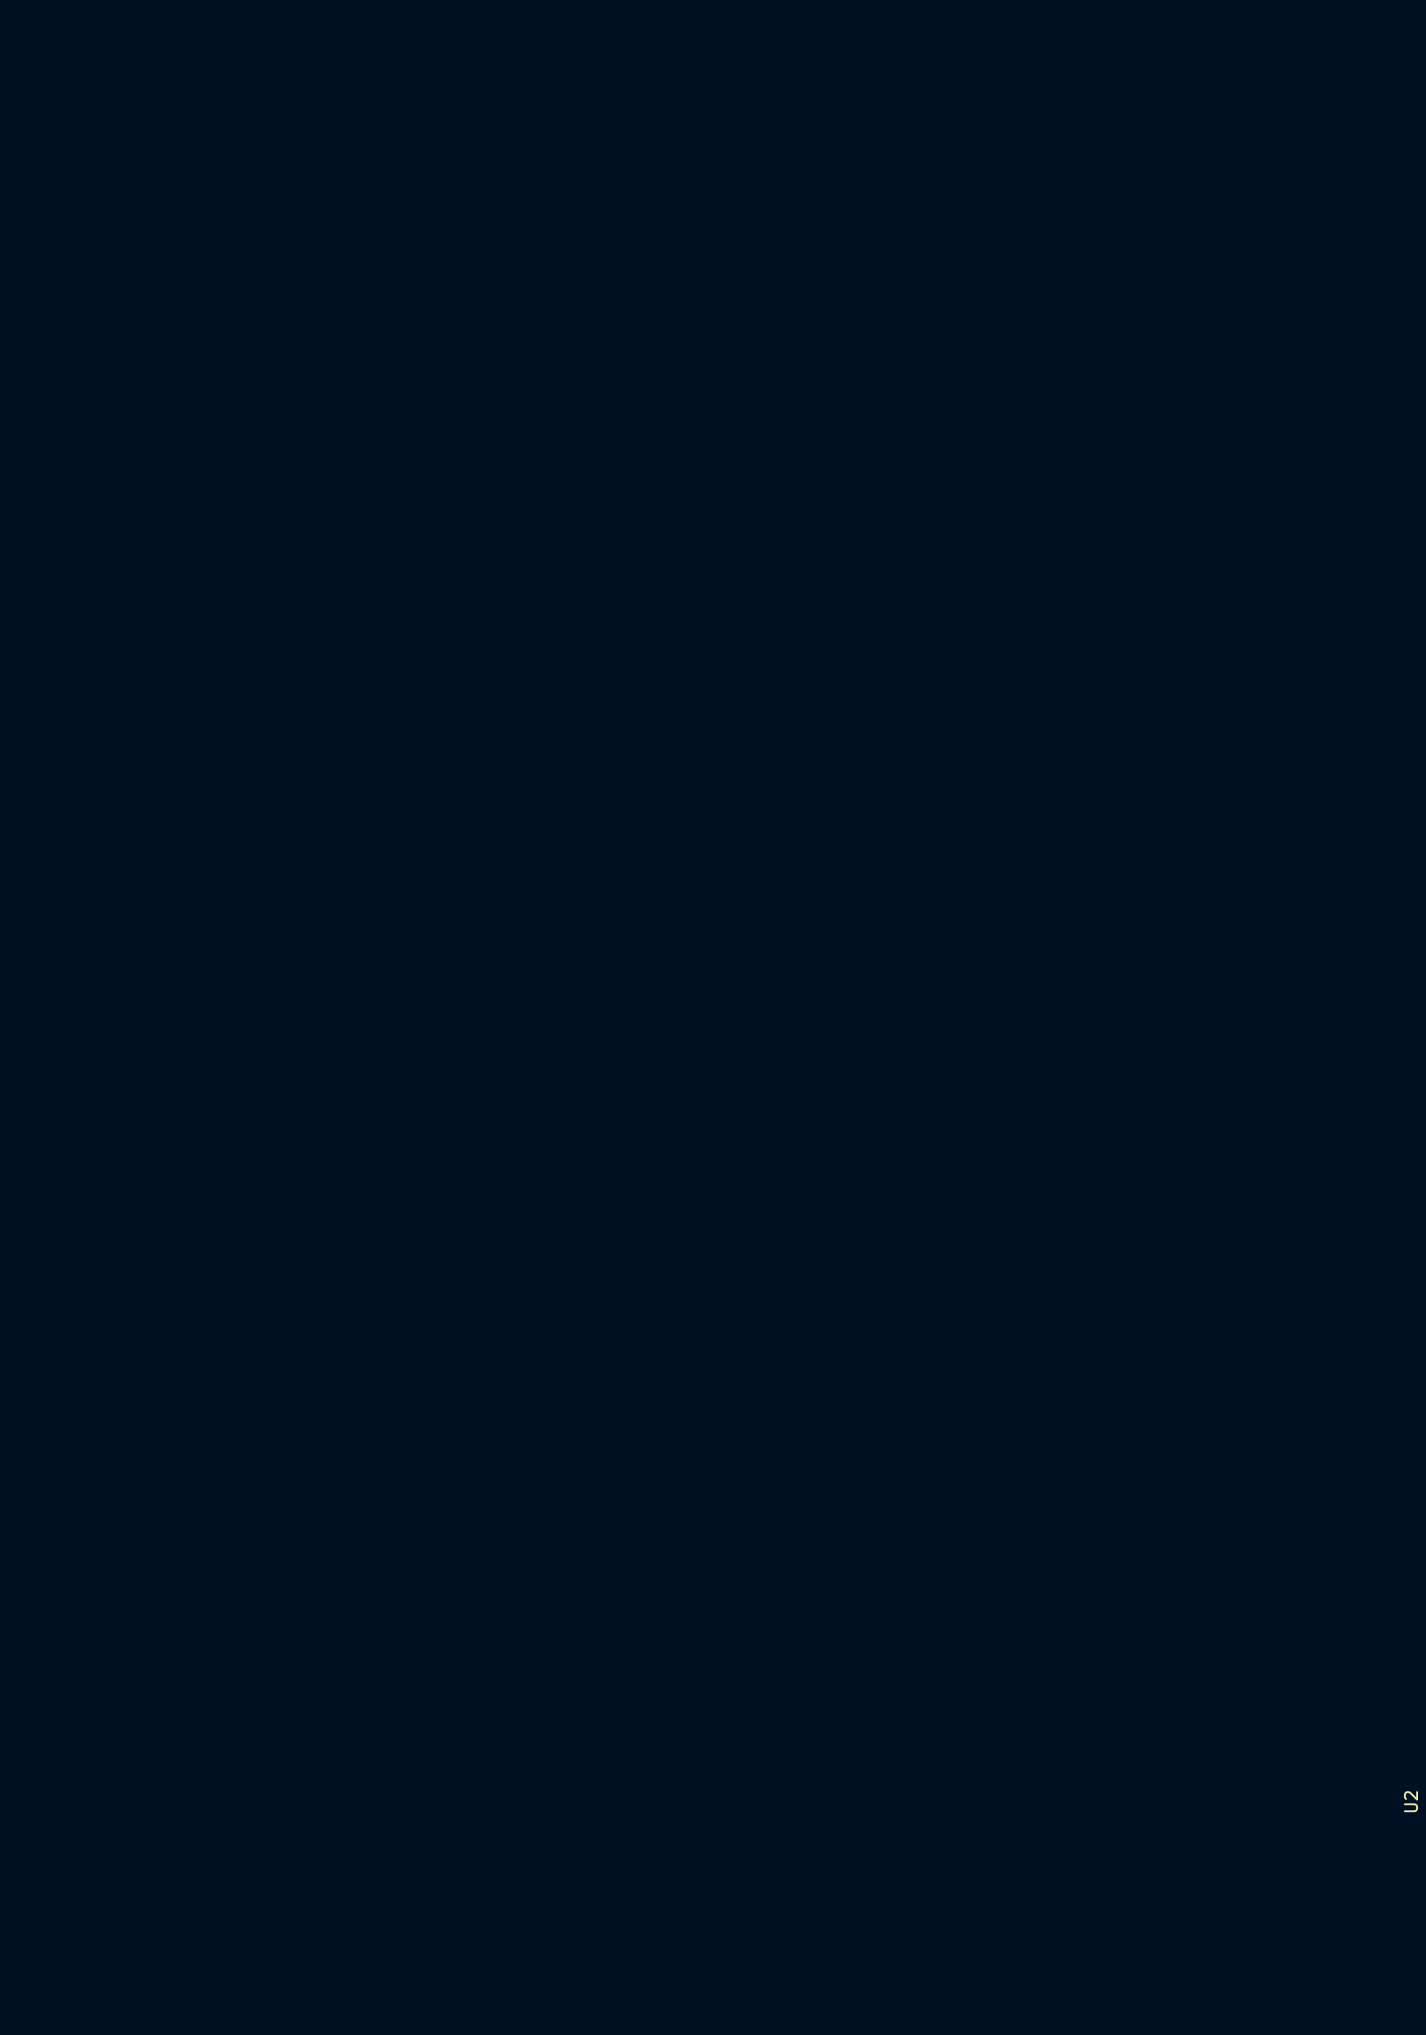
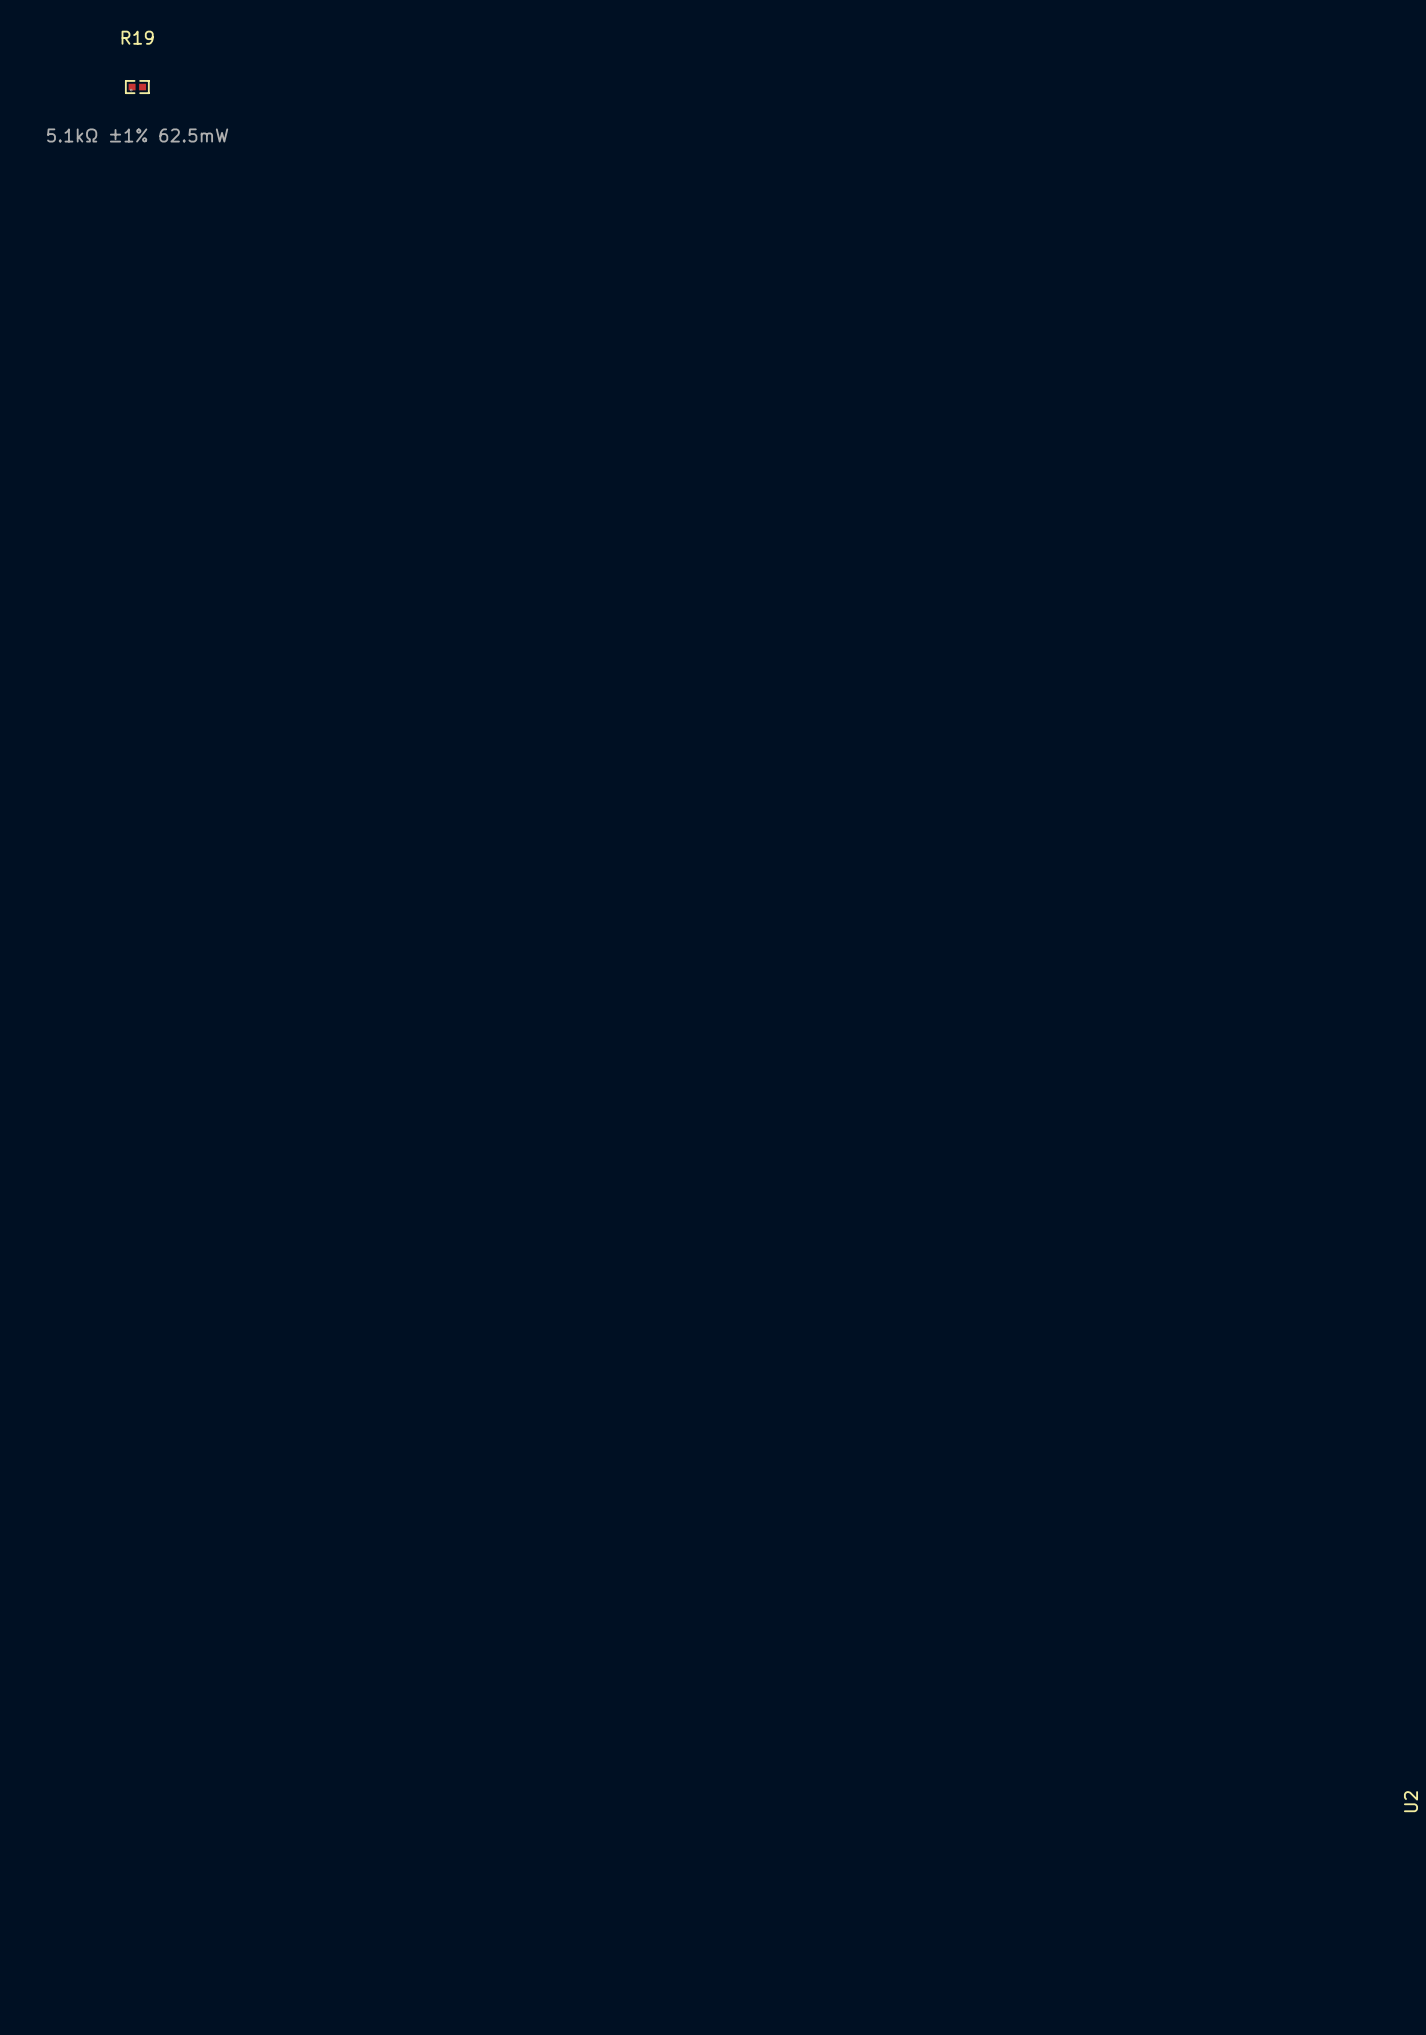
R19: none -> 5.1kΩ ±1% 62.5mW (137, 87)

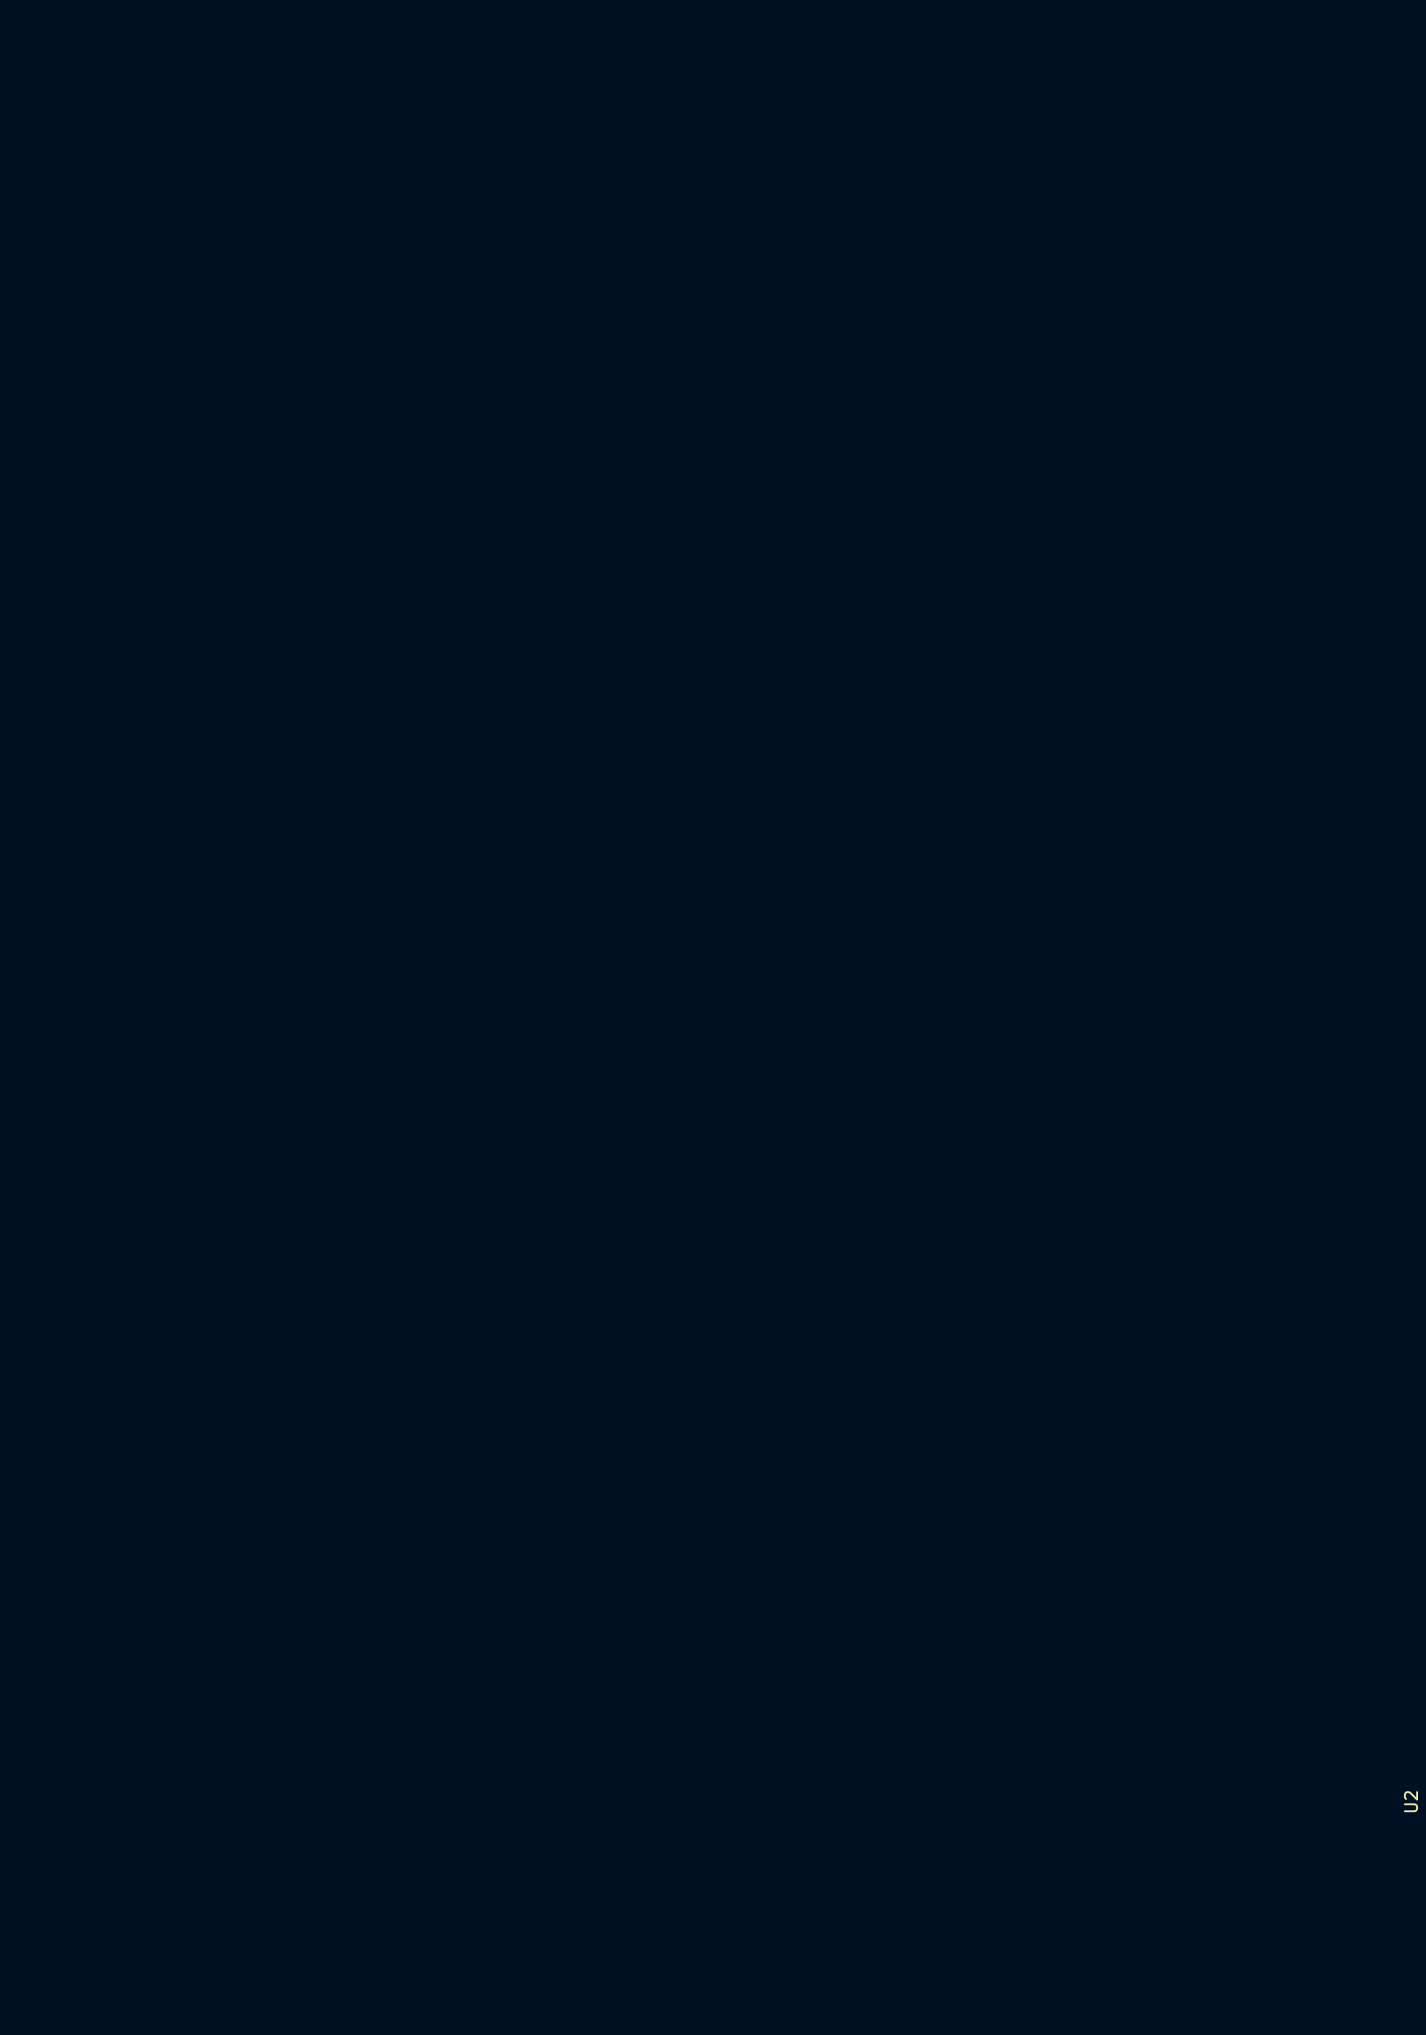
R19: 5.1kΩ ±1% 62.5mW (137, 87) -> none

